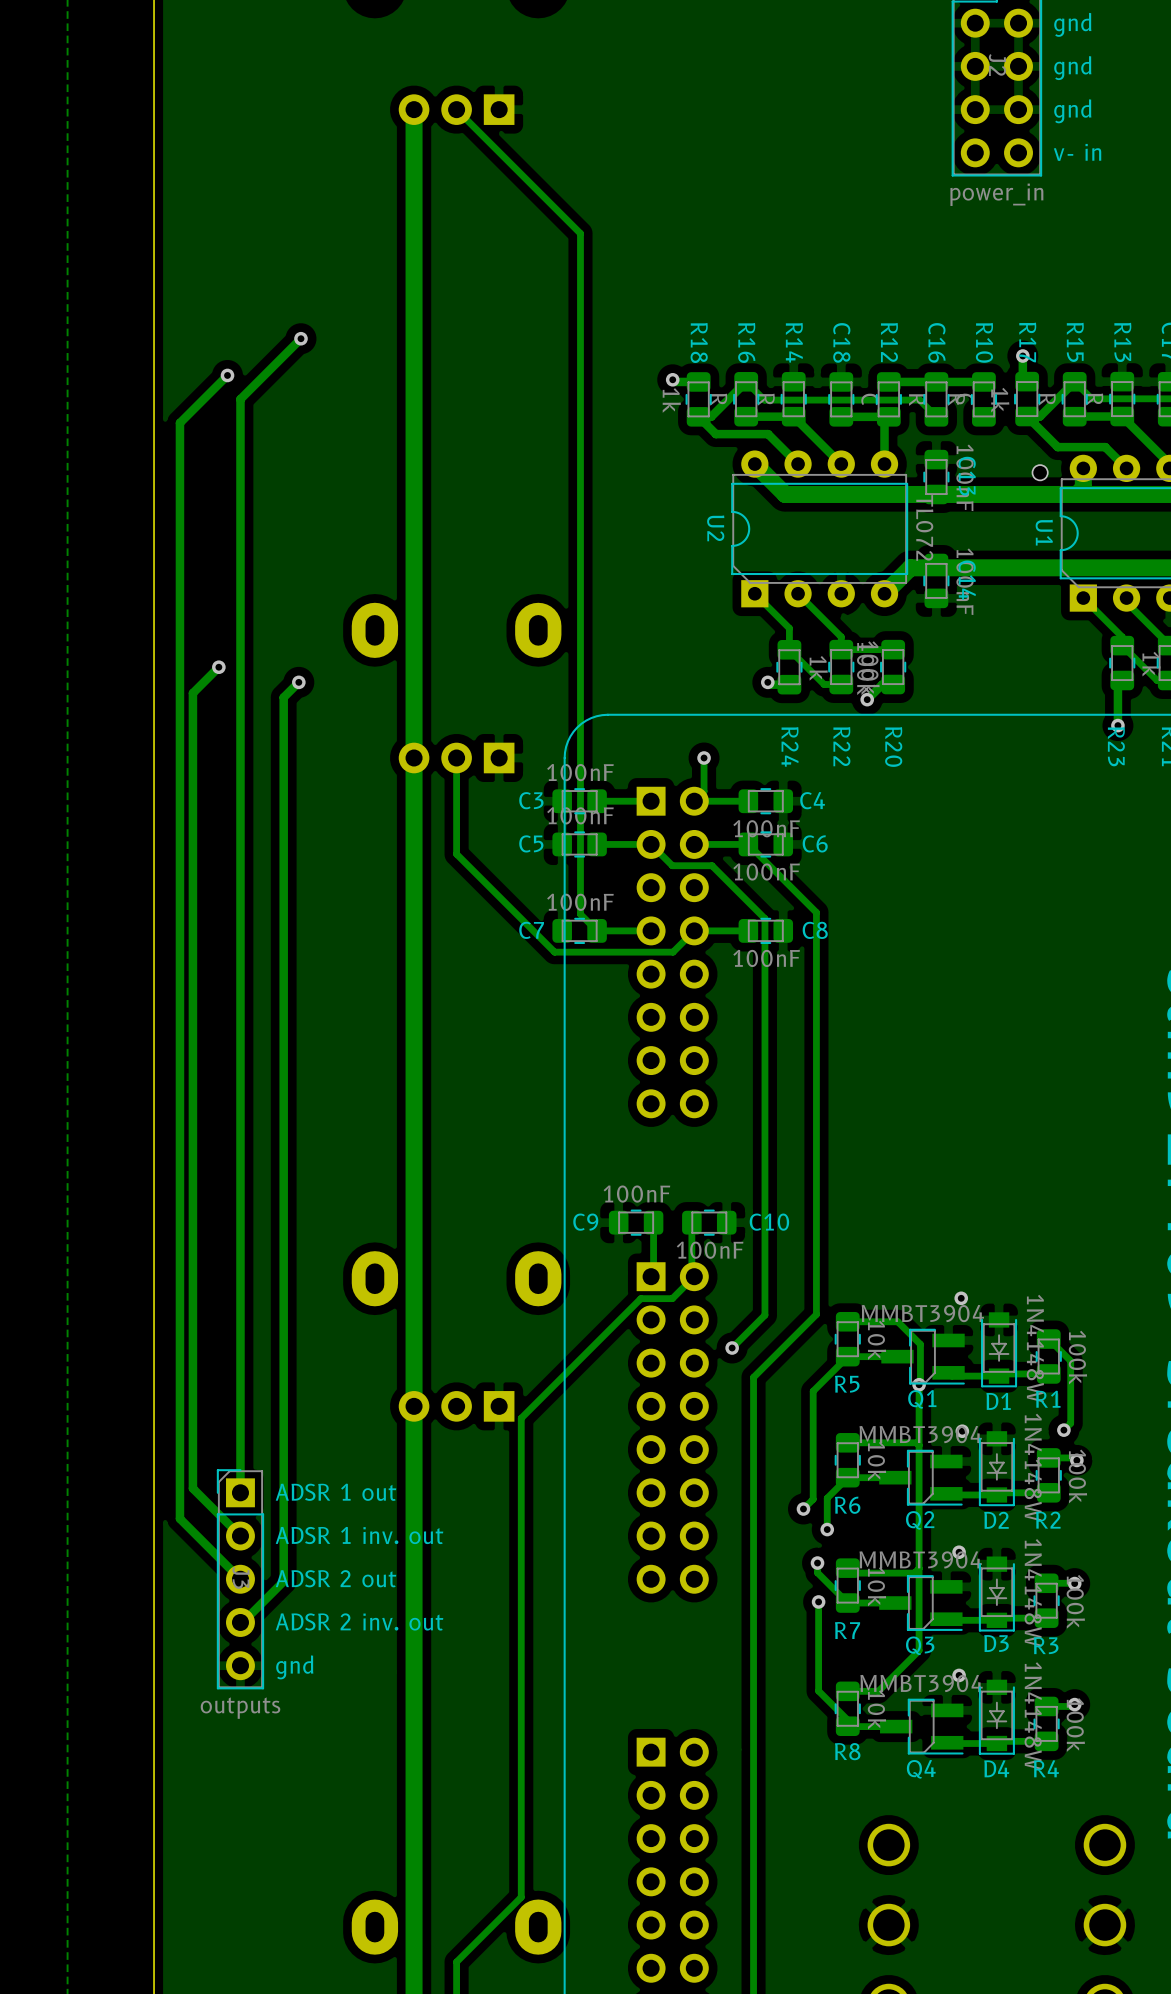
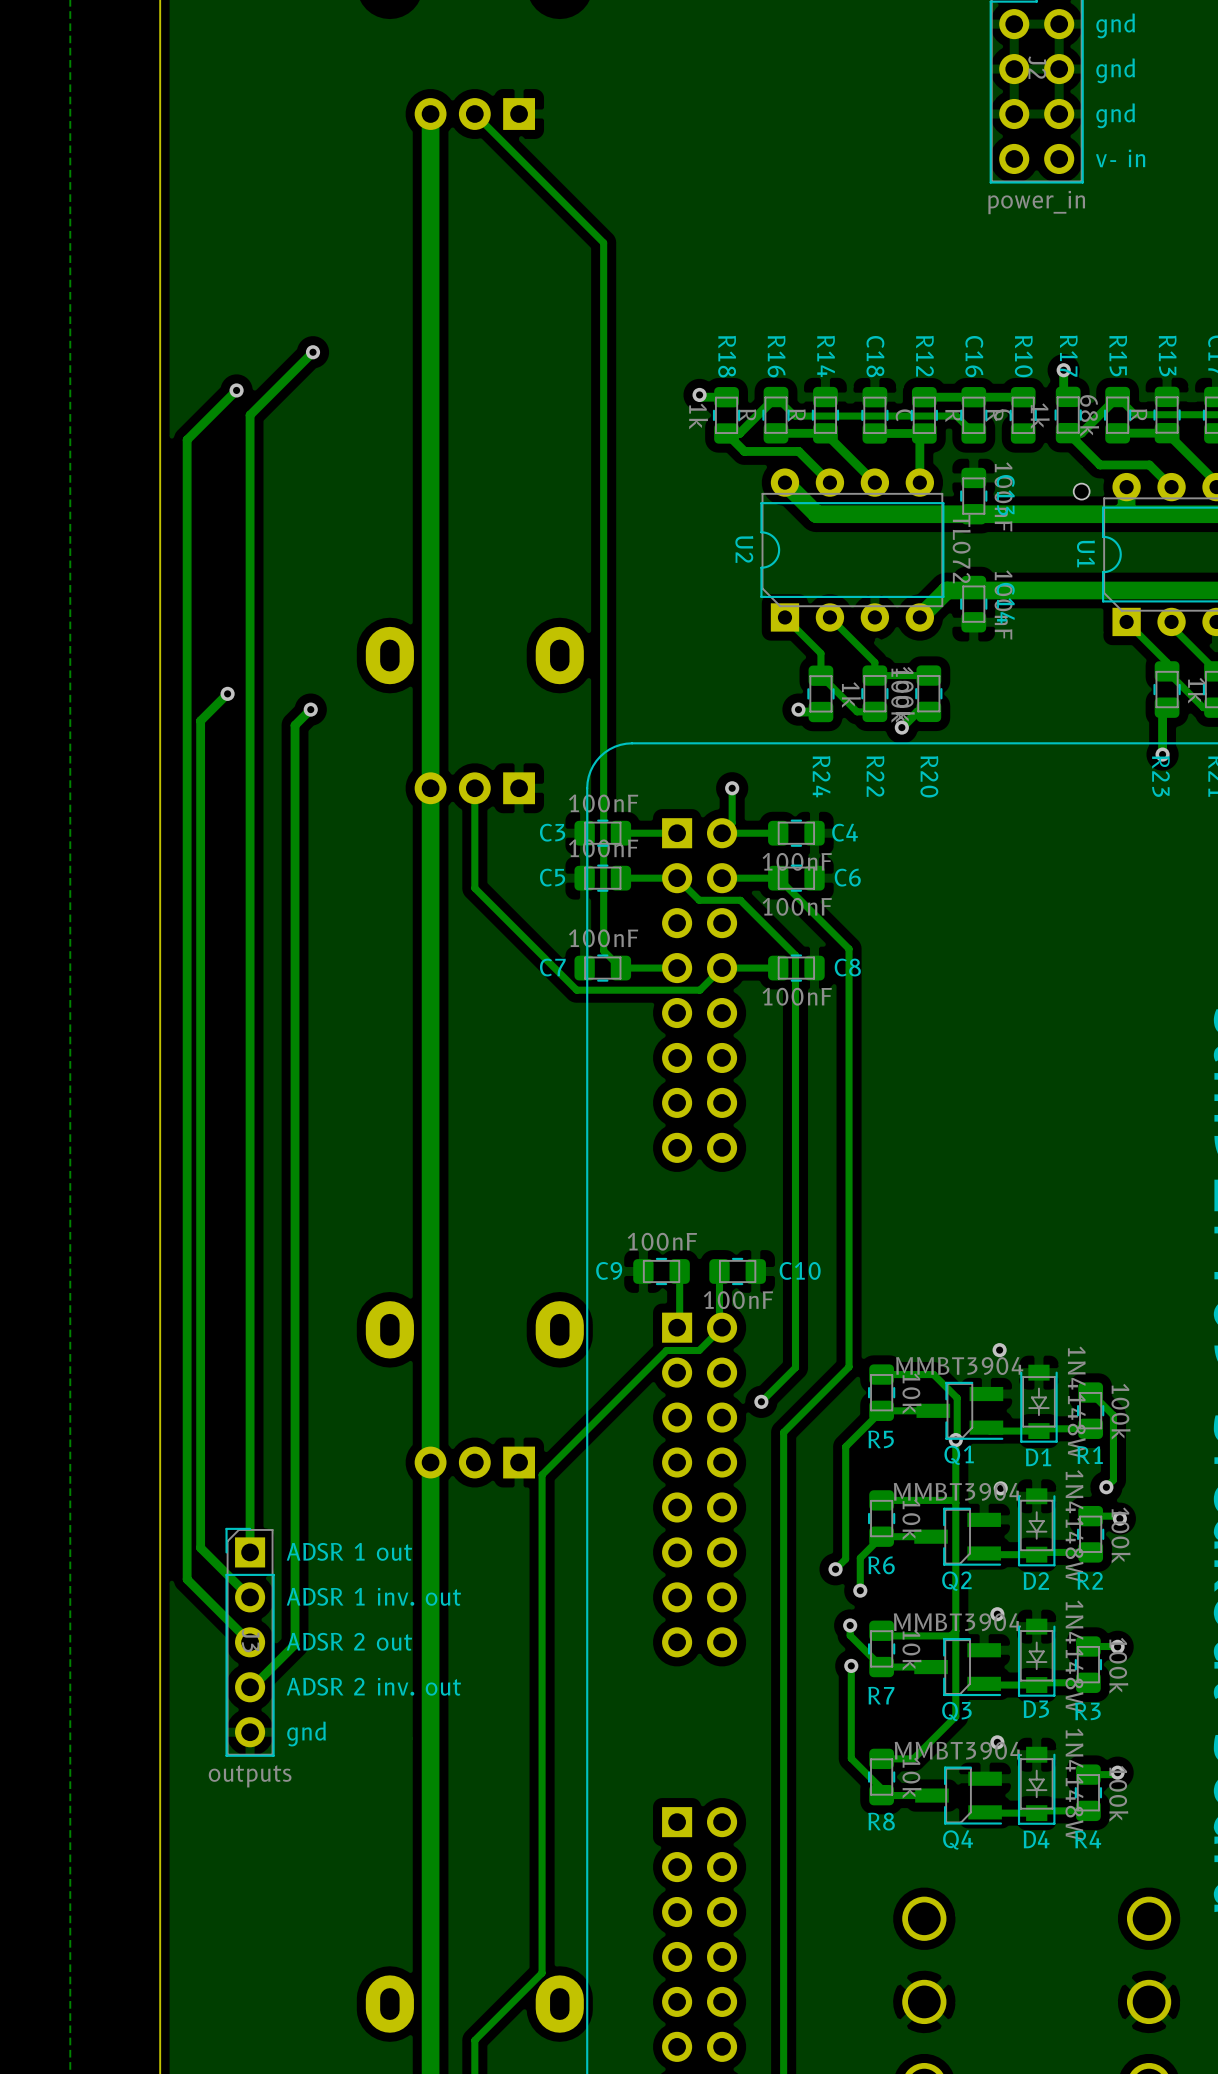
R15 value: R (1047, 399) -> 68k (1089, 415)

